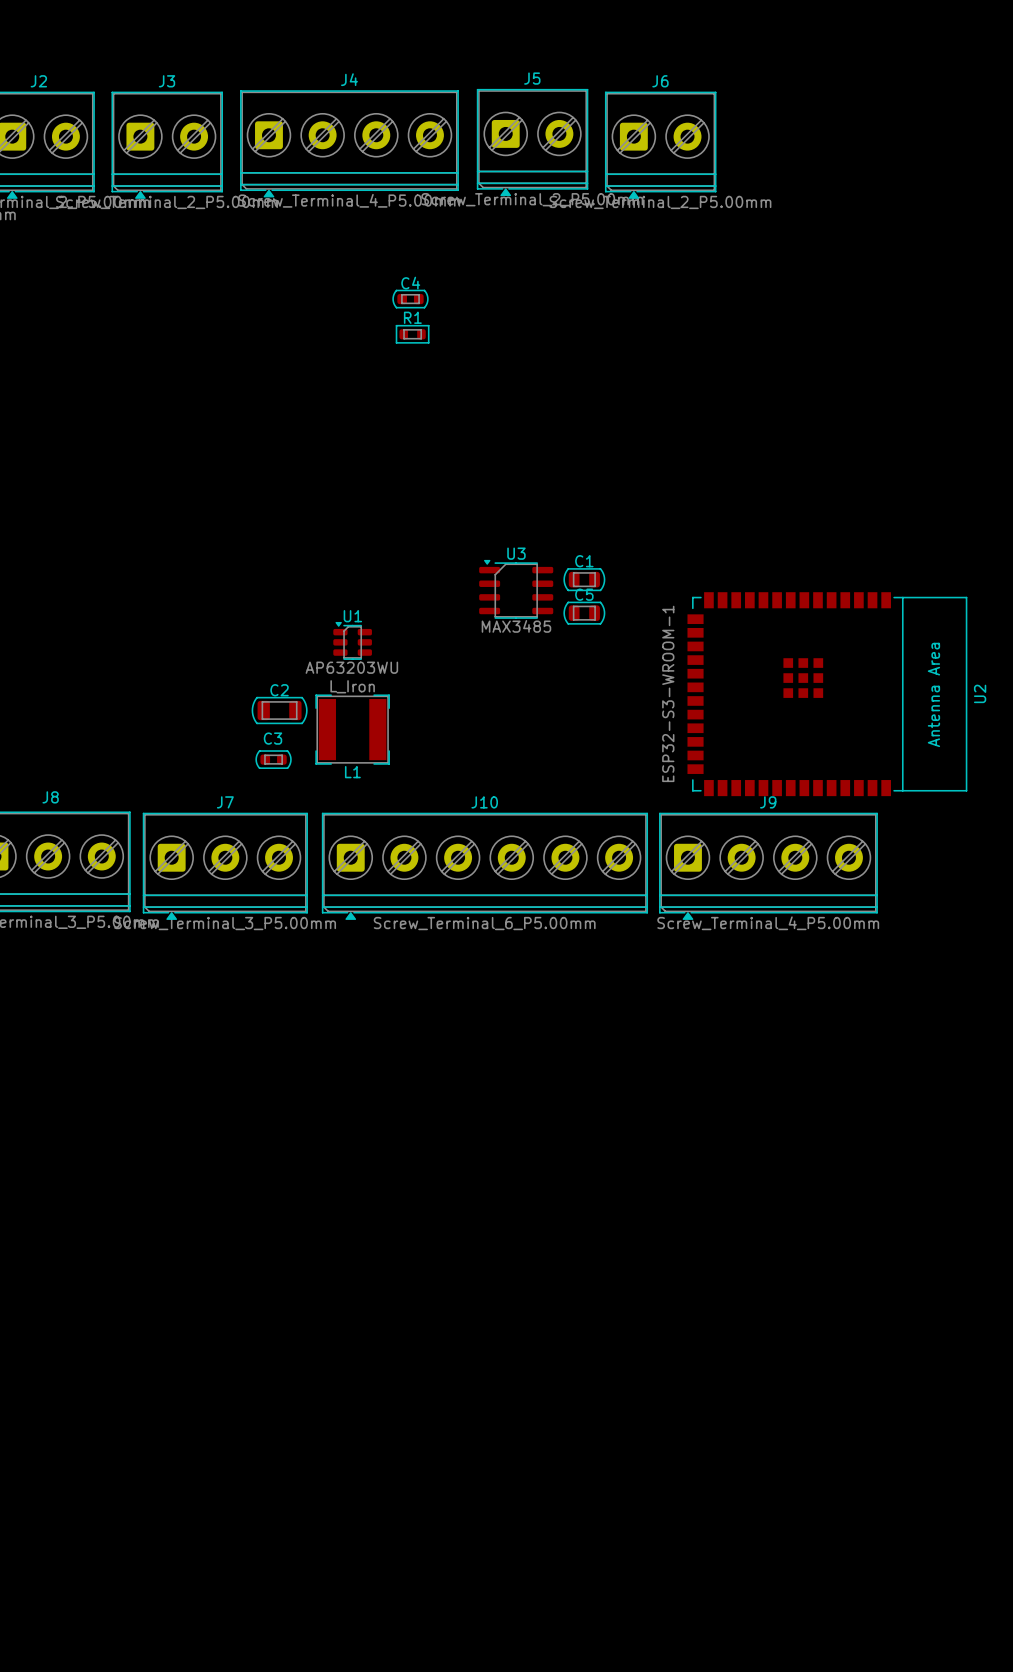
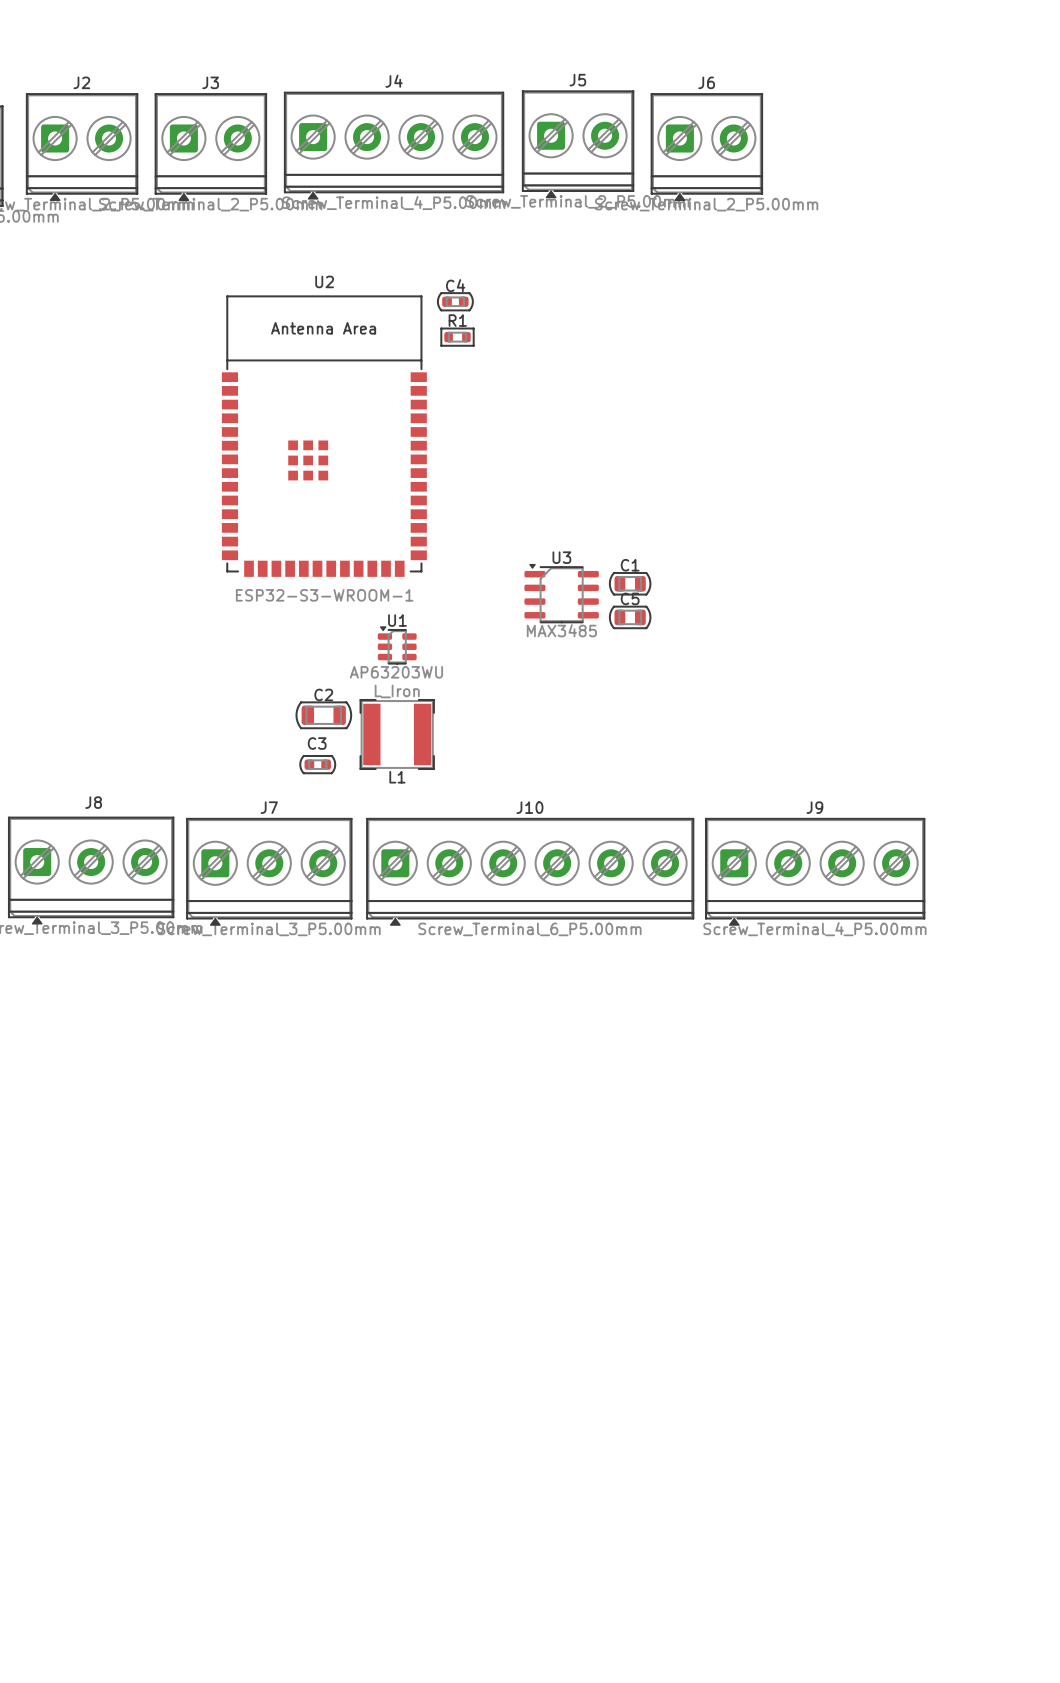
U2 rotation: 0° (827, 694) -> 90° counterclockwise (324, 436)
U2 position: (827, 694) -> (324, 436)

